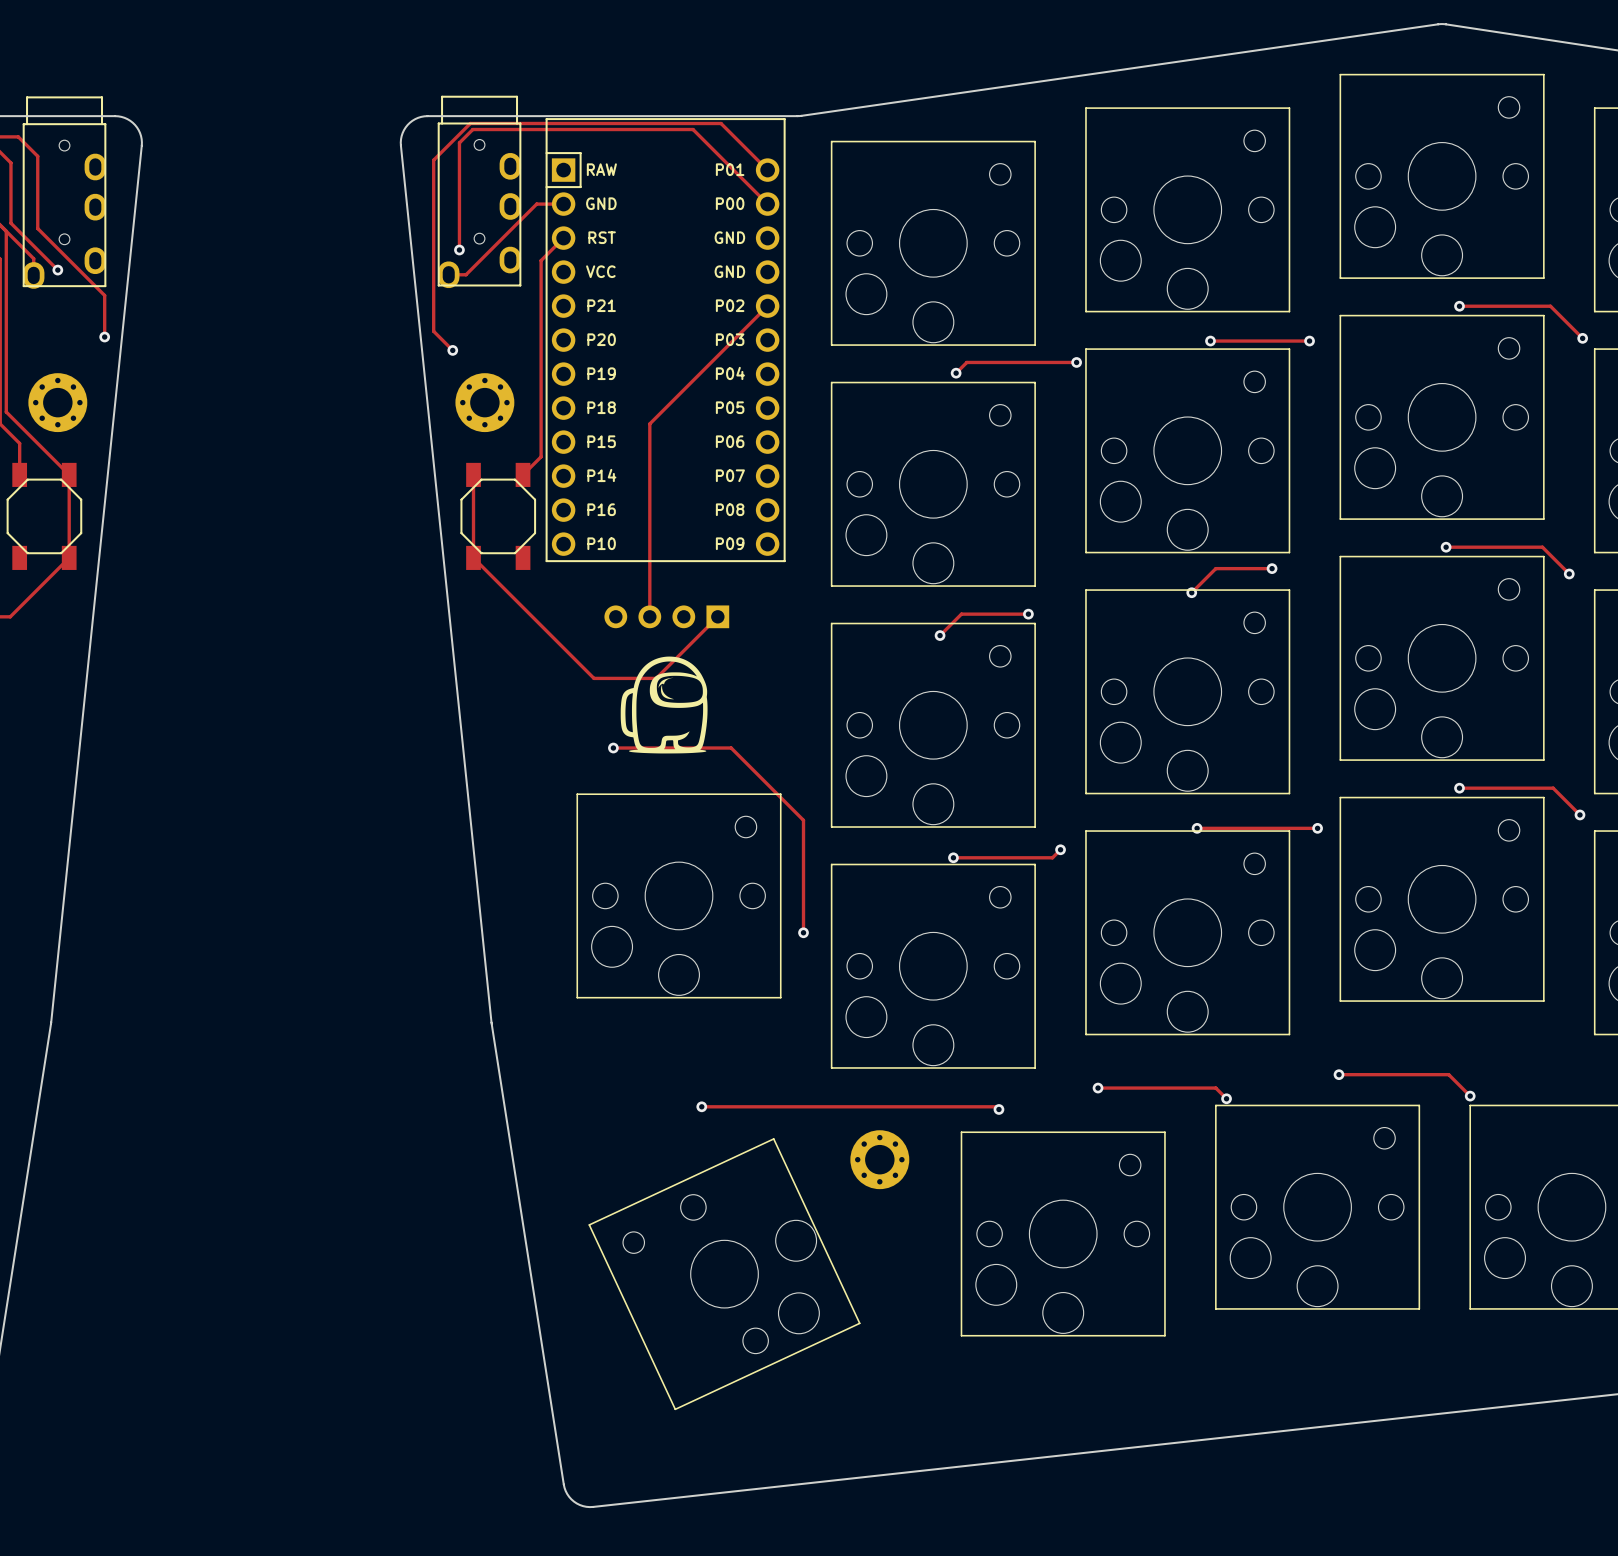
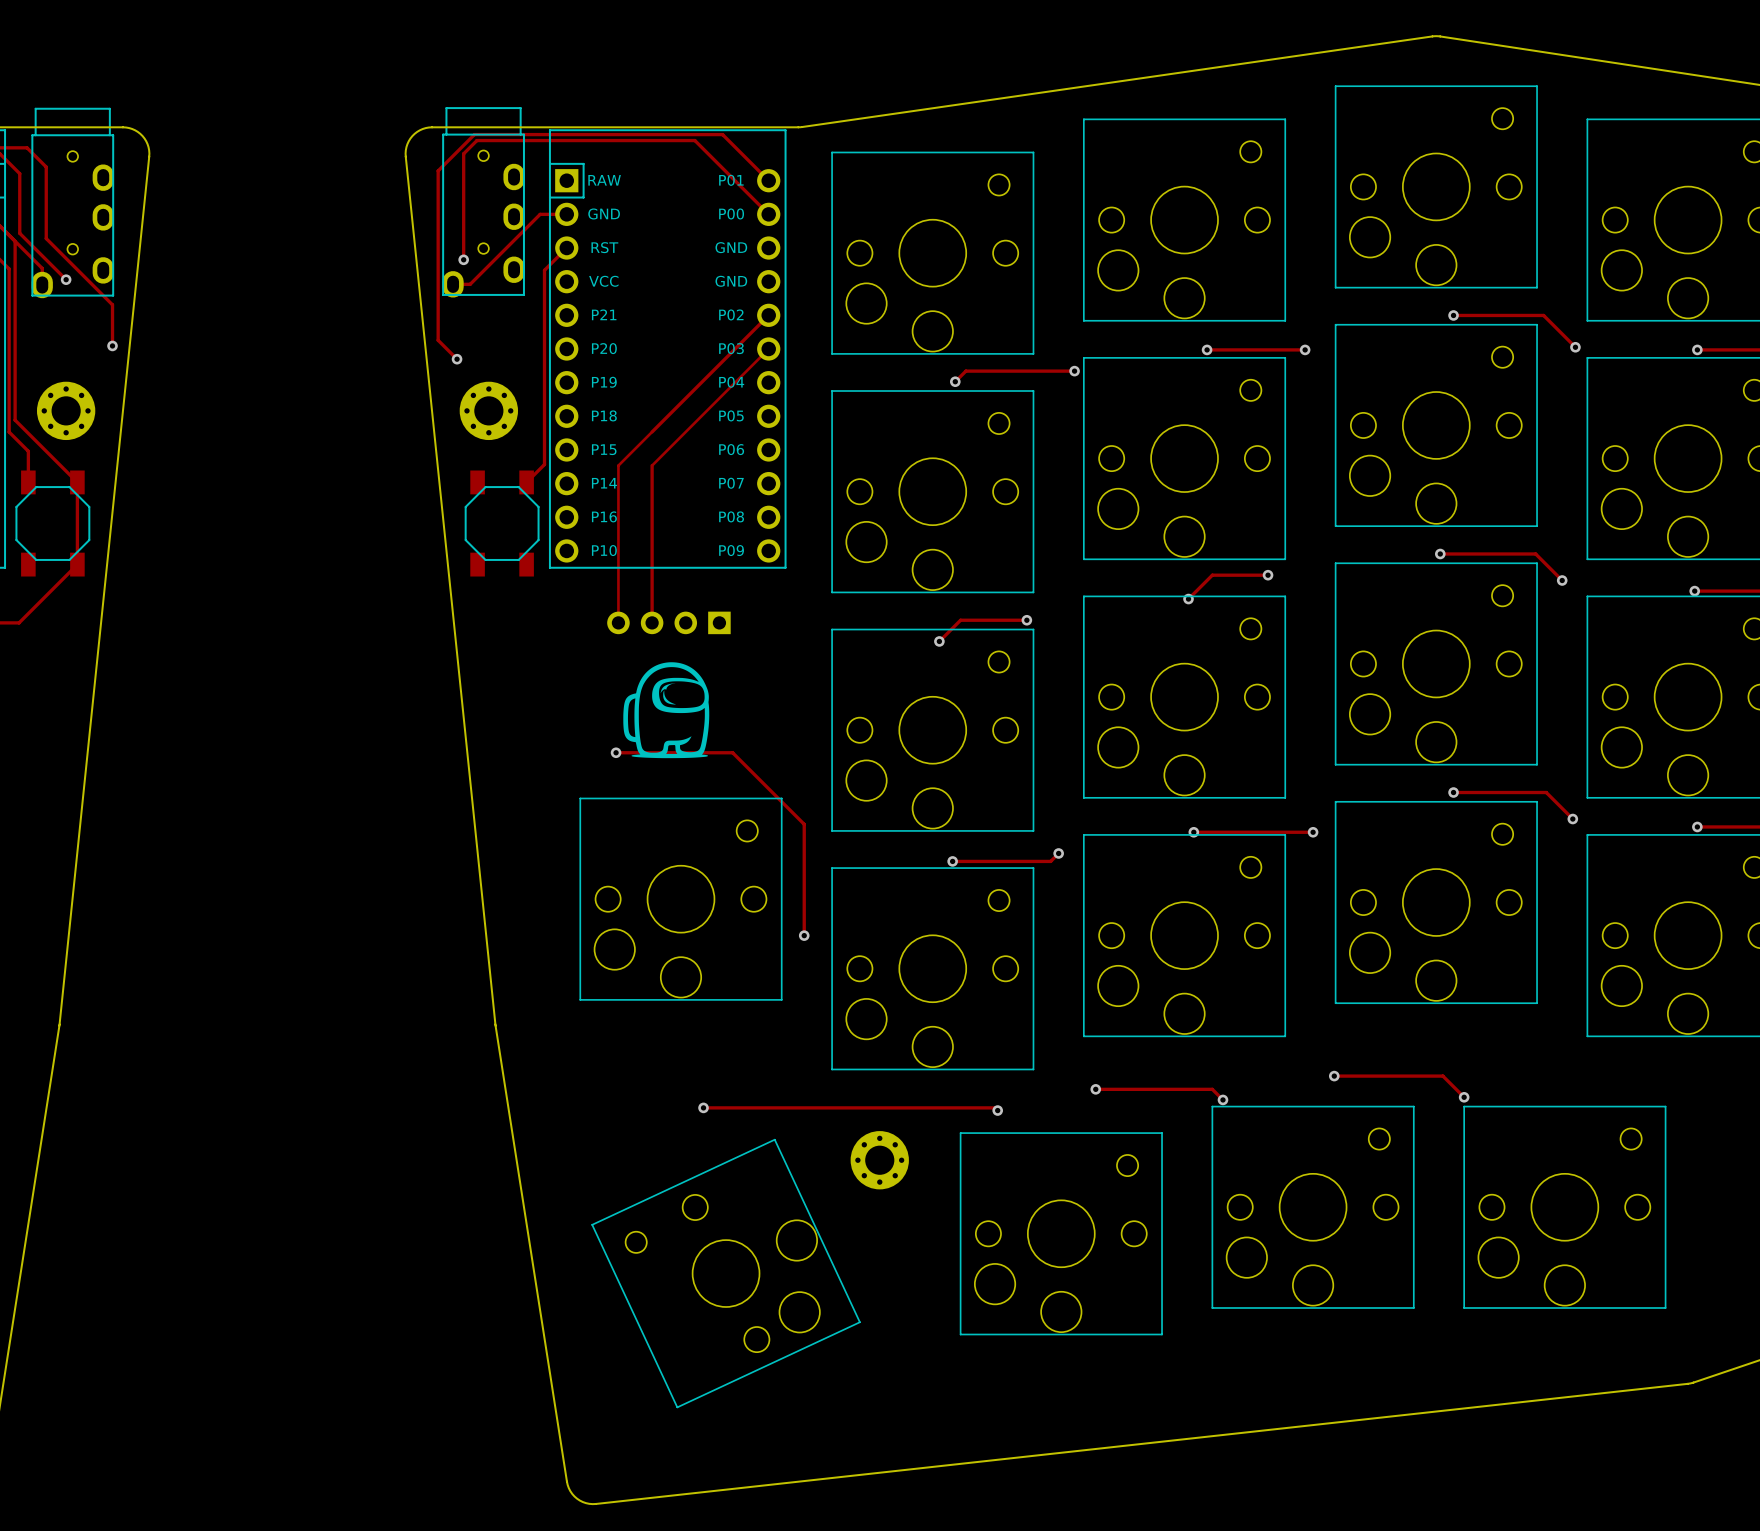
track: (649, 423) (649, 457) -> (768, 348) (652, 465)
track: none -> (652, 431) (618, 465) (618, 622)
track: (473, 474) (473, 557) (593, 678) (656, 678) (717, 616) -> none

